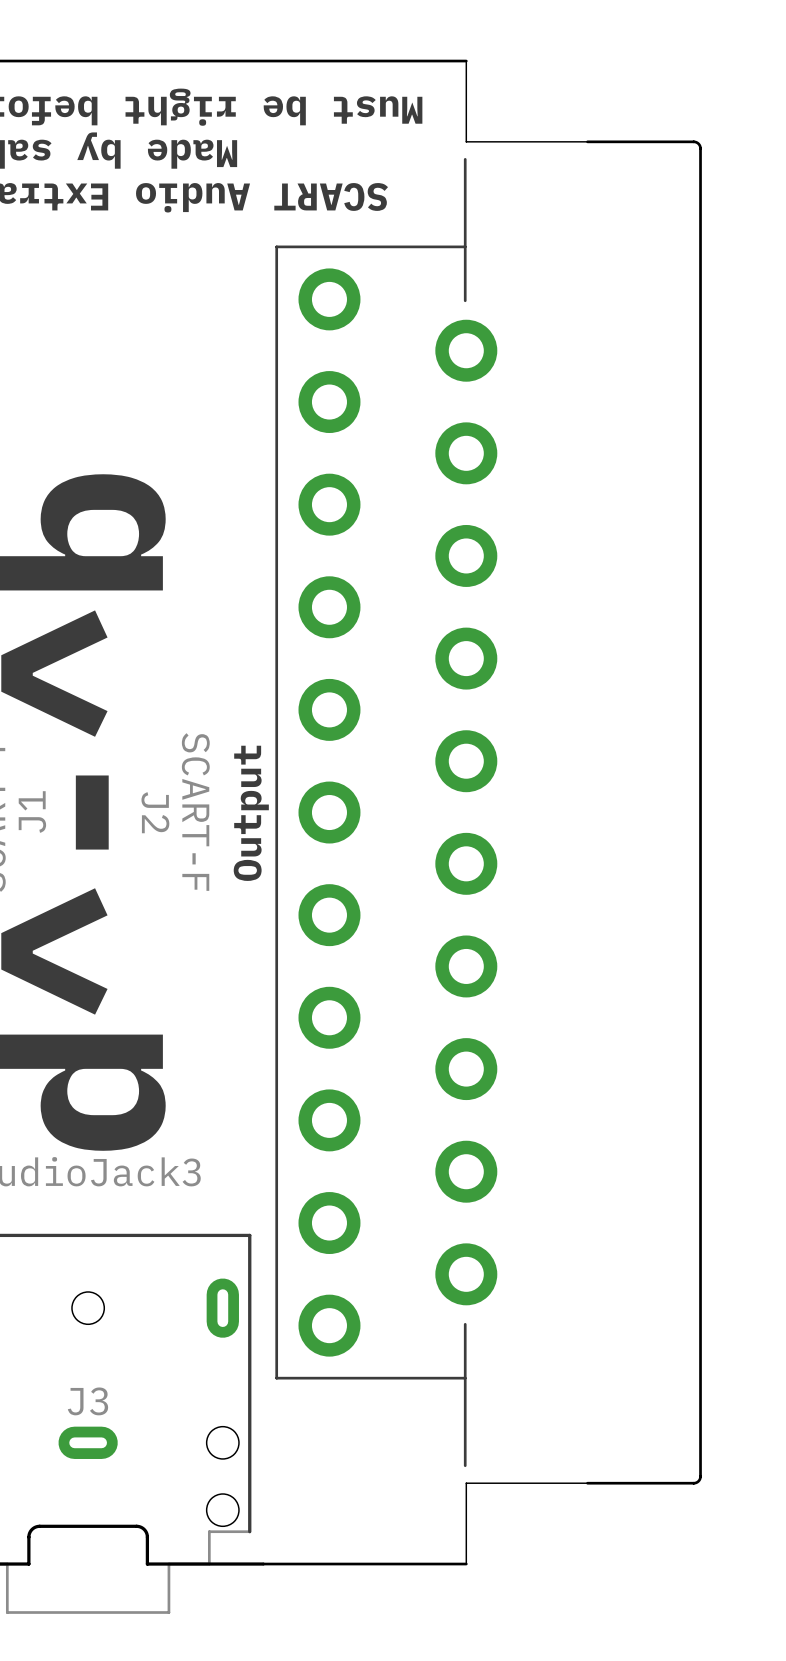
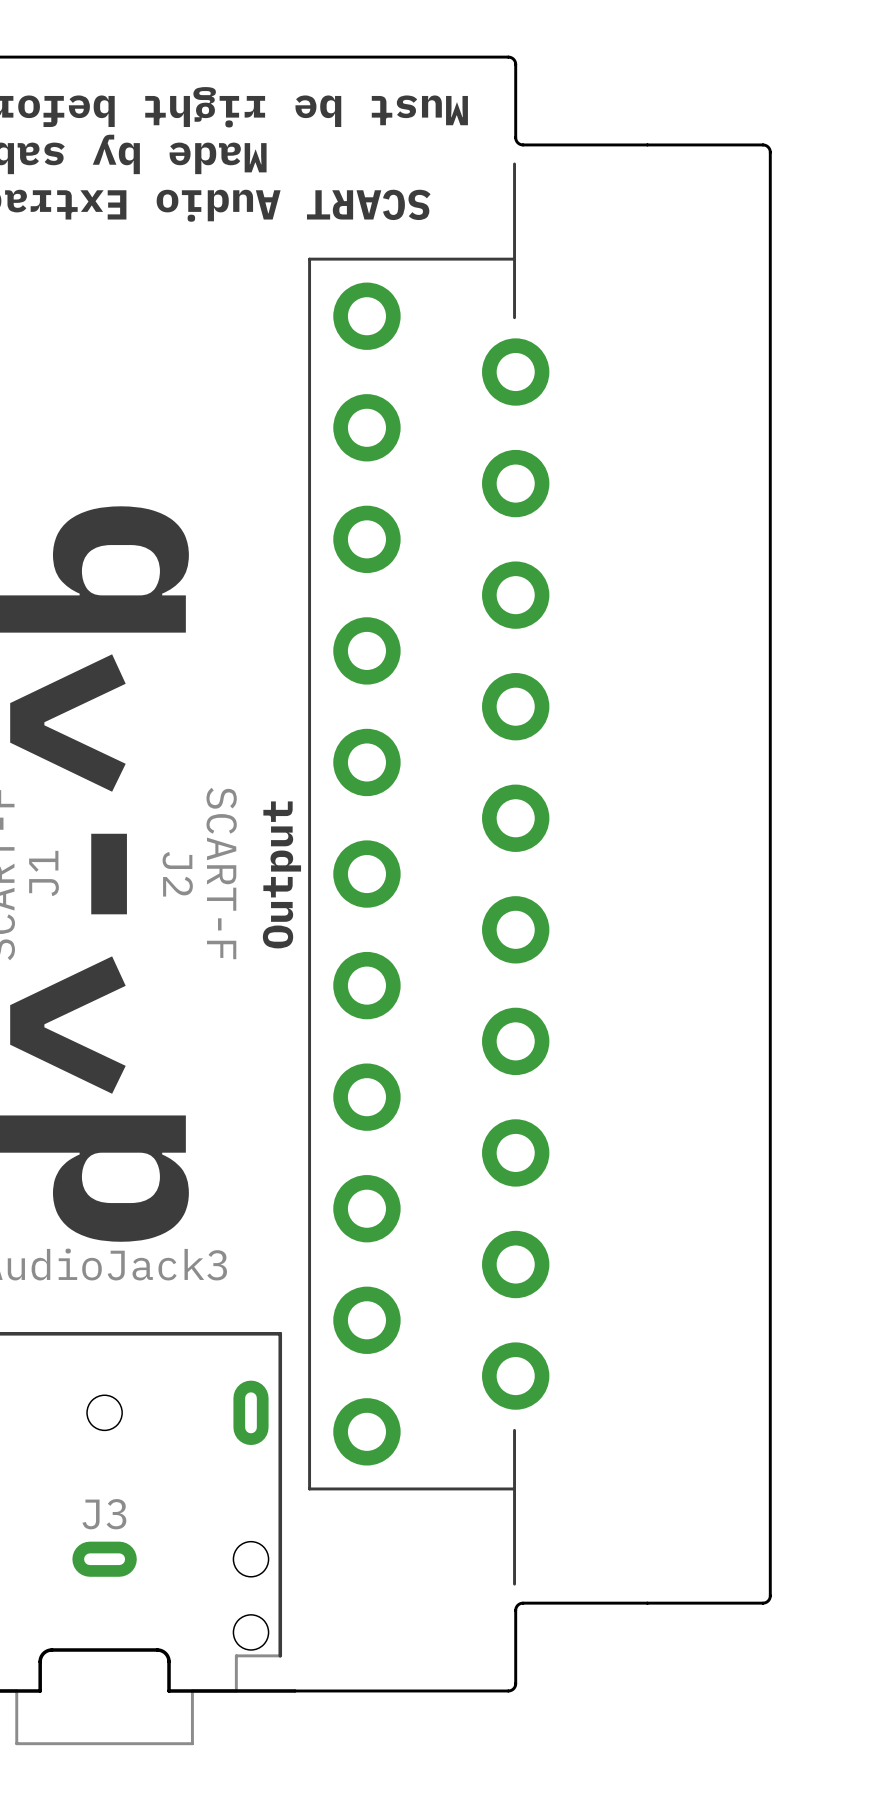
J2 footprint: [275, 60, 589, 1565] -> [308, 55, 649, 1693]
board edge: (459, 61) (466, 61) -> none
board edge: (459, 1564) (466, 1564) -> none

